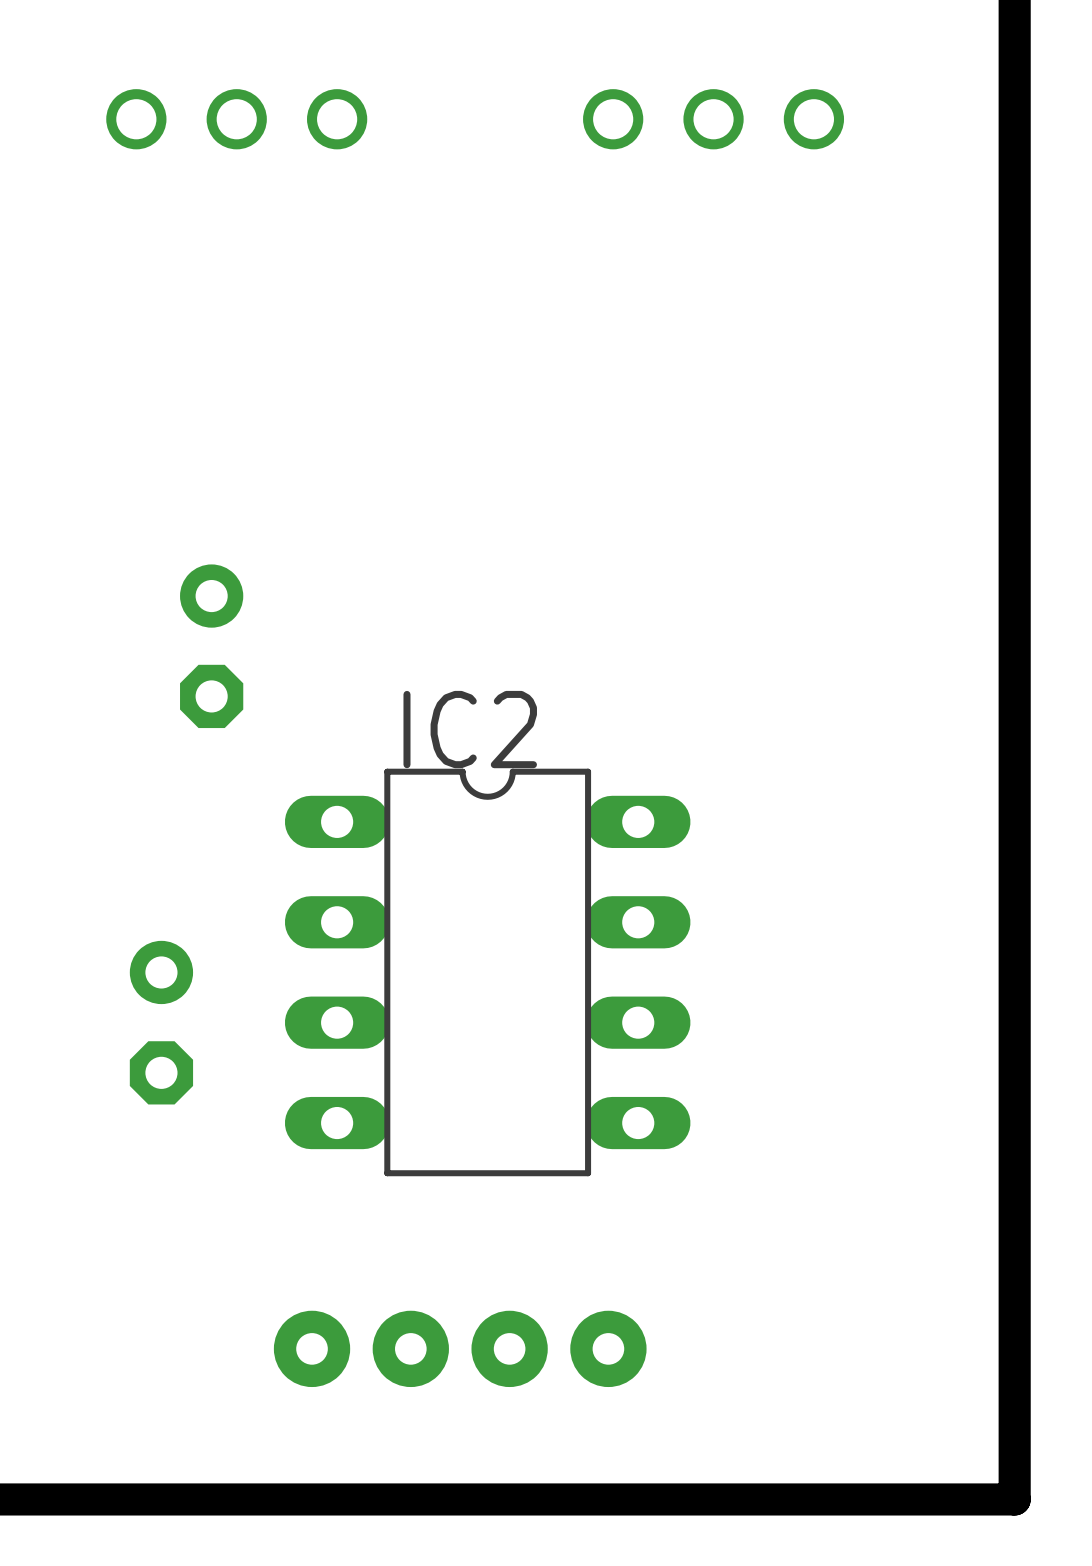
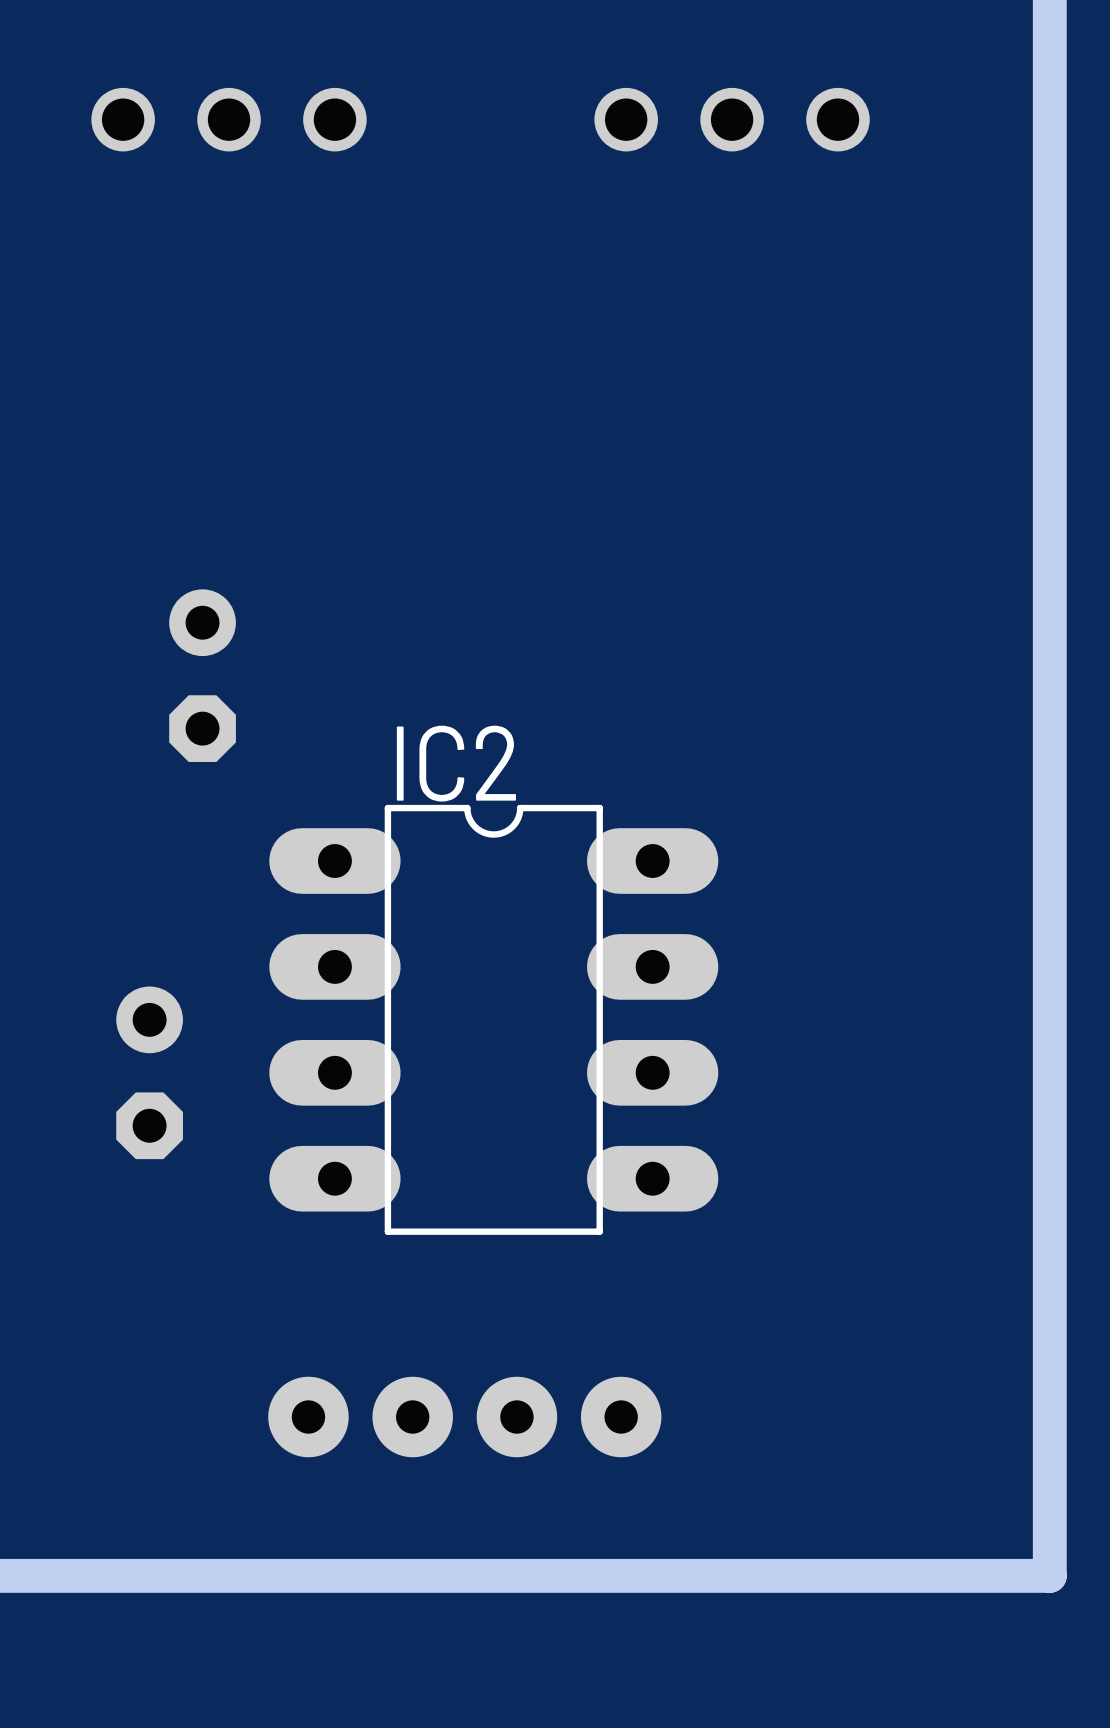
IC2 footprint: [284, 768, 691, 1177] -> [269, 804, 719, 1235]

